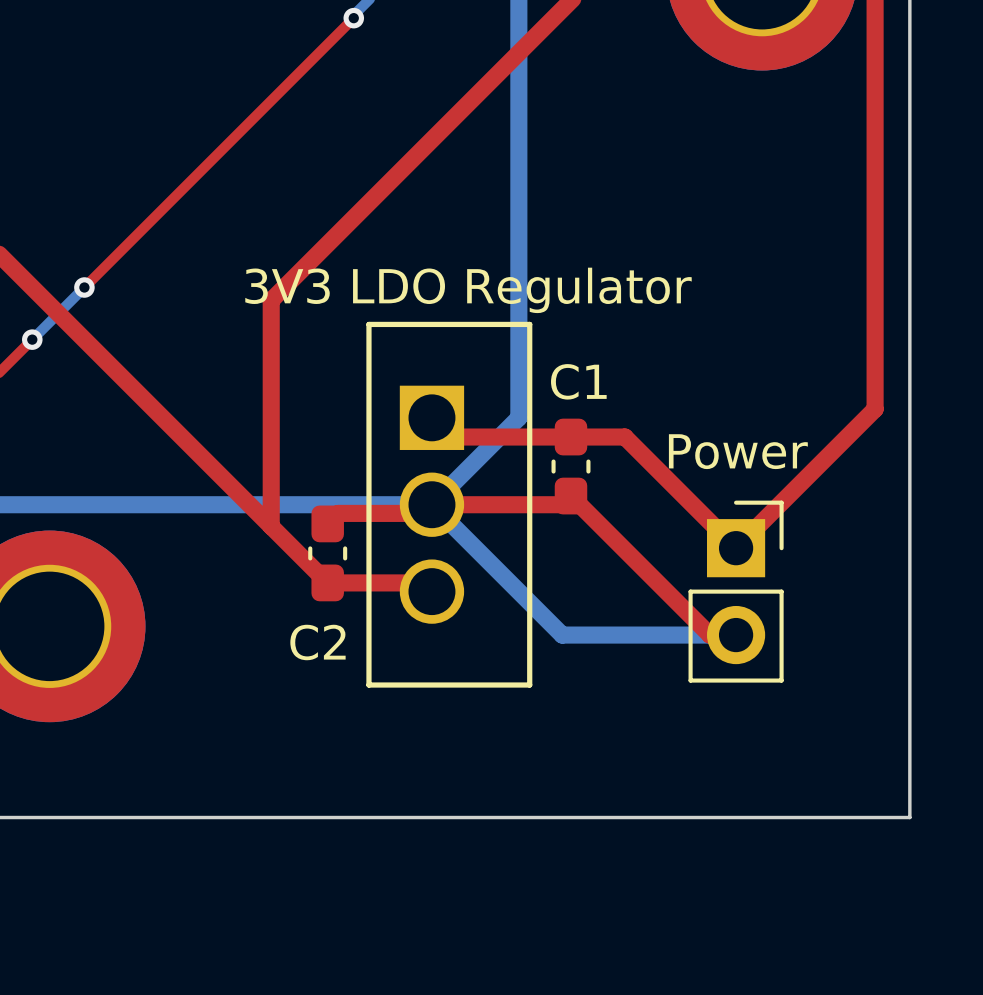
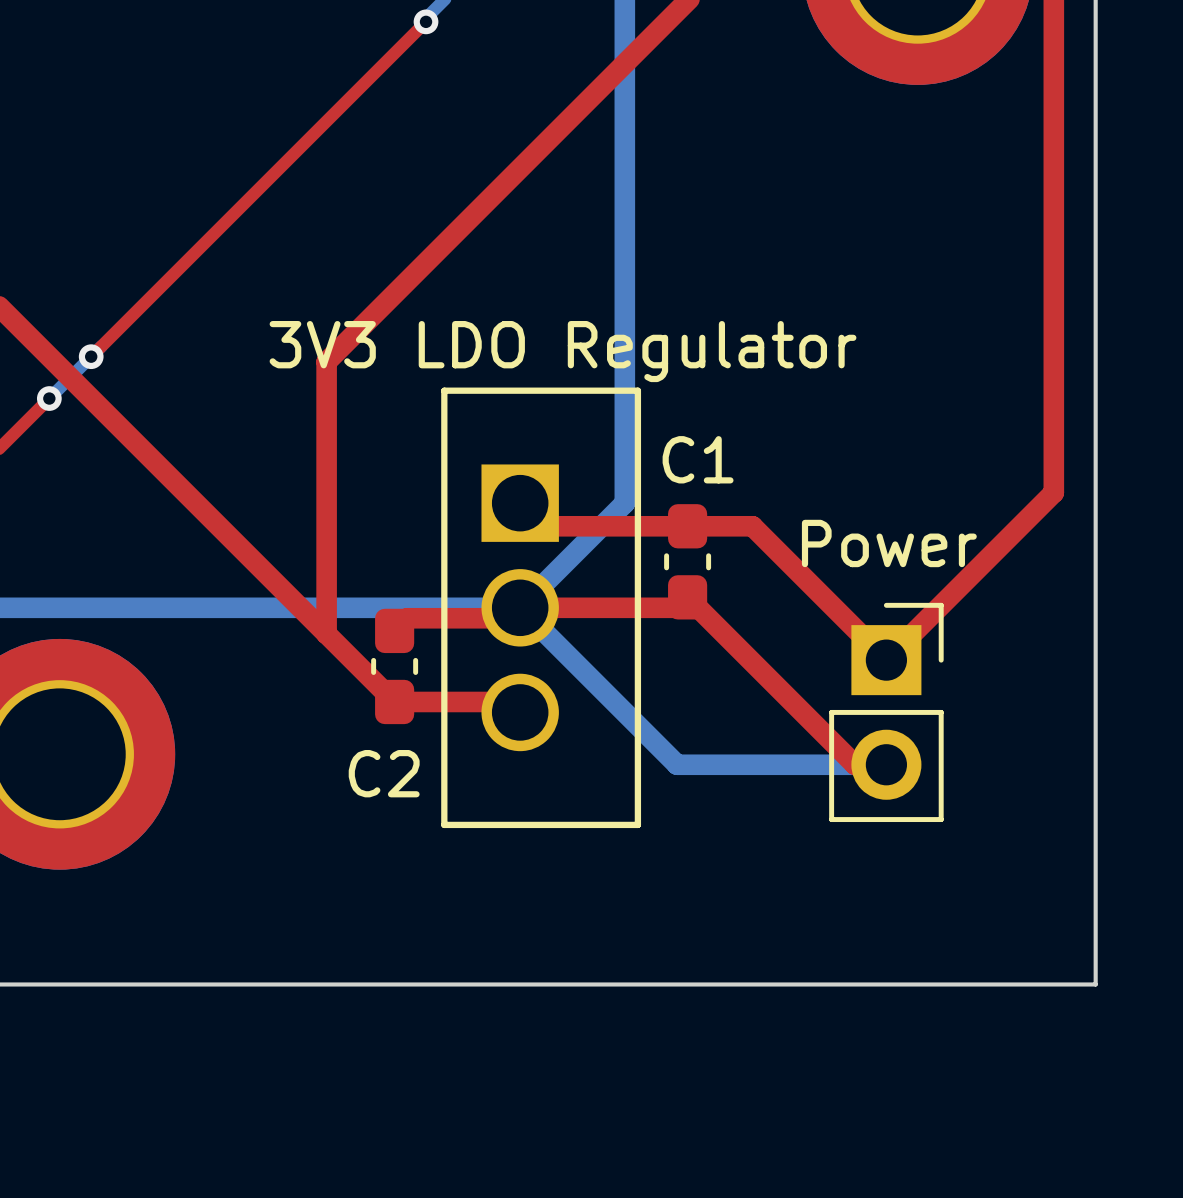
via position: (84, 287) -> (91, 356)
via position: (32, 339) -> (49, 398)

